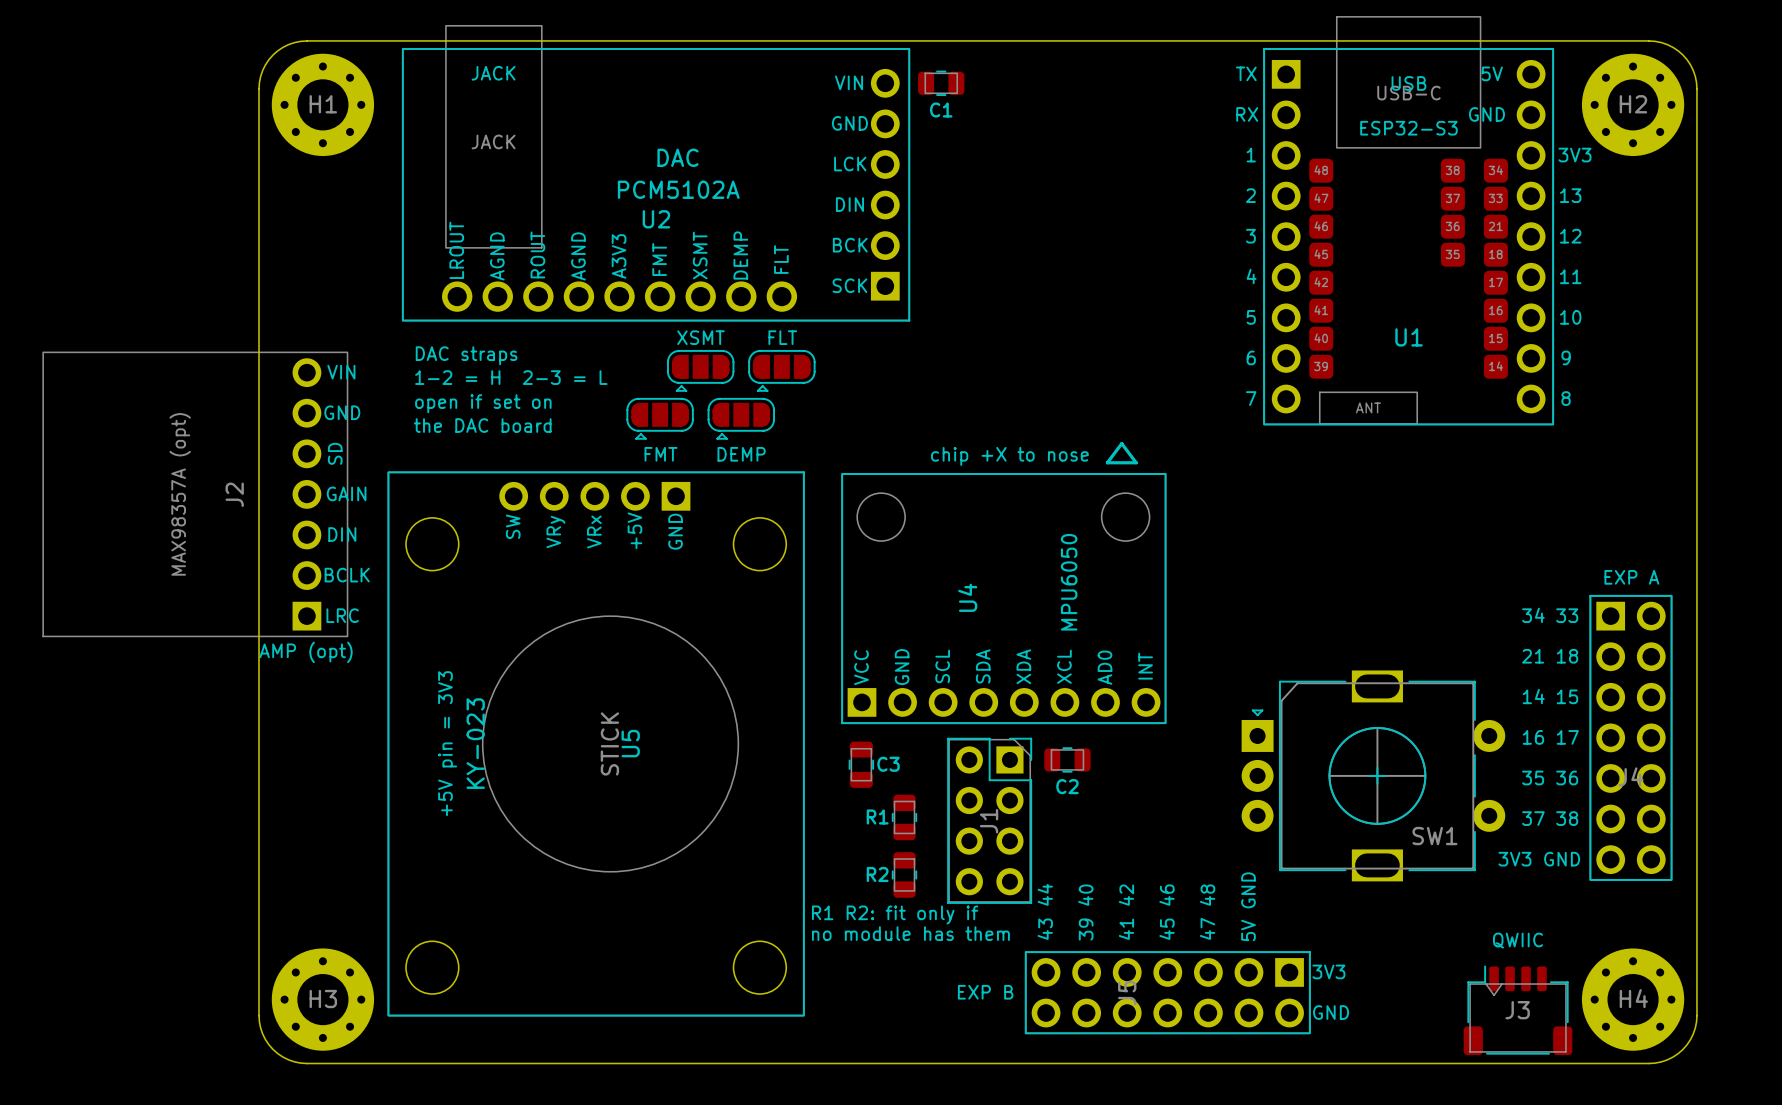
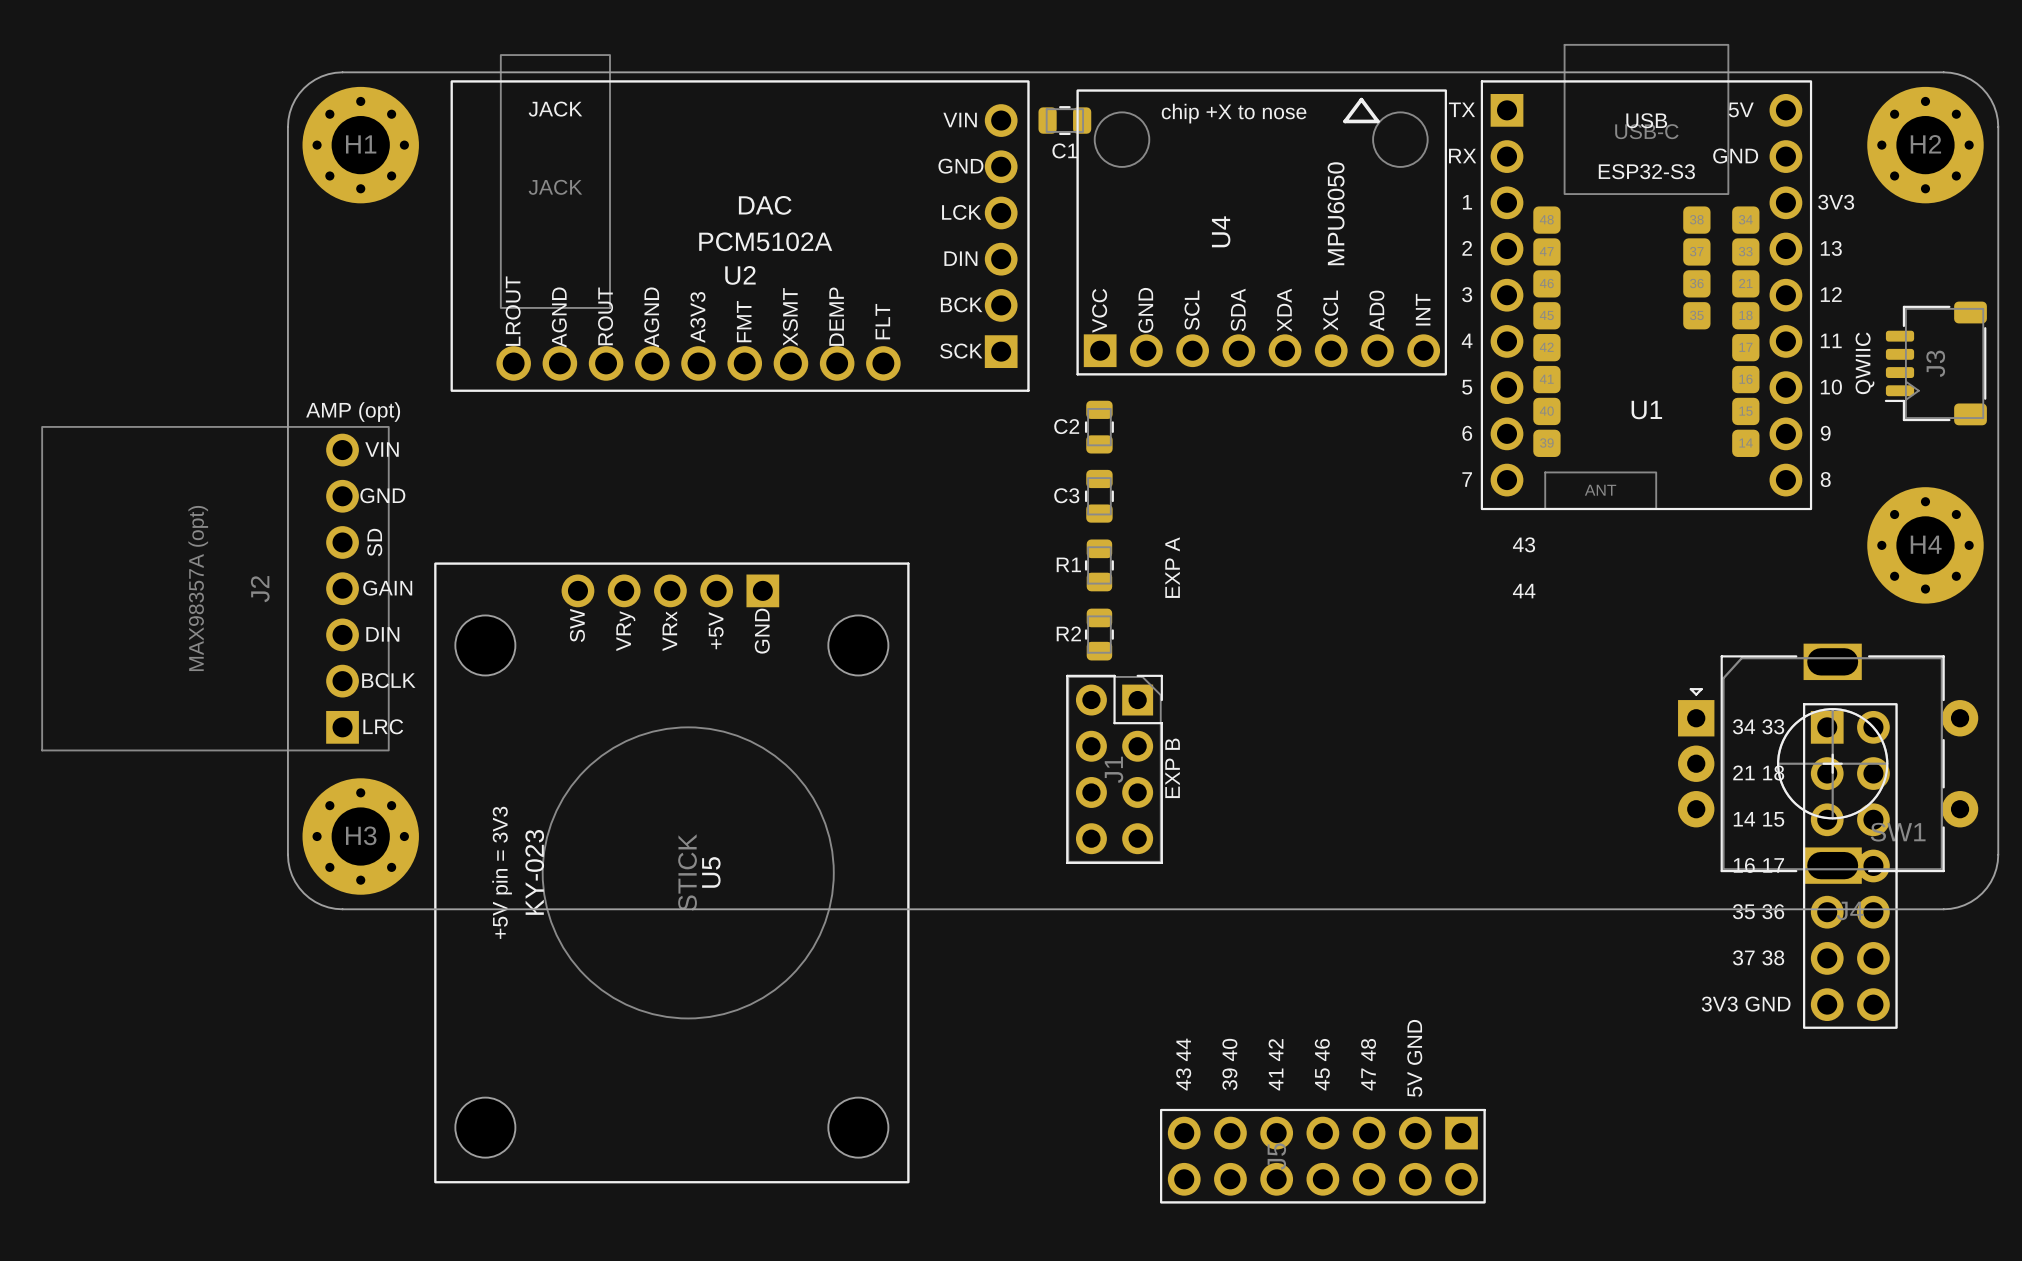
board edge: (1649, 40) (1667, 44) (1682, 55) (1693, 70) (1696, 88) (1696, 1015) (1695, 1027) (1690, 1039) (1682, 1049) (1673, 1057) (1661, 1061) (1649, 1063) (306, 1063) (294, 1061) (282, 1057) (268, 1044) (262, 1033) (259, 1021) (259, 727) -> (1870, 72) (1943, 72) (1964, 76) (1976, 83) (1986, 93) (1994, 106) (1997, 119) (1998, 854) (1996, 868) (1990, 882) (1982, 893) (1970, 901) (1957, 907) (1943, 909) (342, 909) (321, 905) (303, 893) (292, 875) (287, 854)
H2 position: (1633, 104) -> (1925, 145)
U1 position: (1408, 220) -> (1646, 277)
text: none -> QWIIC (1864, 363)
text: XSMT (701, 337) -> none
text: FLT (782, 337) -> none
text: DAC straps (466, 355) -> none
part: (700, 370) -> none
part: (781, 370) -> none
text: 1-2 = H 2-3 = L (511, 377) -> none
text: open if set on (483, 403) -> none
part: (660, 418) -> none
part: (741, 418) -> none
text: the DAC board (482, 425) -> none
line: (1121, 443) (1107, 462) (1136, 462) (1121, 443) -> (1361, 99) (1345, 121) (1377, 121) (1361, 99)
text: FMT (661, 454) -> none
text: DEMP (741, 454) -> none
text: none -> 43 (1524, 544)
text position: chip +X to nose (1009, 456) -> chip +X to nose (1234, 113)
text: none -> EXP A (1172, 567)
text: none -> 44 (1524, 591)
text: EXP A (1631, 577) -> none
U4 position: (1003, 598) -> (1261, 232)
text position: AMP (opt) (306, 652) -> AMP (opt) (353, 412)
C2 rotation: 0° (1067, 759) -> 90° clockwise (1099, 427)
C2 position: (1067, 759) -> (1099, 427)
C3 position: (861, 764) -> (1099, 496)
C3 name position: C3 (888, 764) -> C3 (1066, 495)
SW1 position: (1373, 775) -> (1828, 763)
R1 position: (904, 817) -> (1099, 565)
J1 position: (989, 820) -> (1114, 769)
R2 position: (904, 874) -> (1099, 634)
text: R1 R2: fit only if (895, 914) -> none
text: no module has them (910, 933) -> none
text: QWIIC (1518, 940) -> none
text: 3V3 (1328, 971) -> none
text rotation: 0° (985, 992) -> 90° counterclockwise (1172, 768)
text position: EXP B (985, 992) -> EXP B (1172, 768)
H3 position: (322, 999) -> (360, 836)
H4 position: (1633, 999) -> (1925, 545)
J3 rotation: 0° (1518, 1010) -> 90° counterclockwise (1935, 363)
J3 position: (1518, 1010) -> (1935, 363)
text: GND (1331, 1012) -> none

